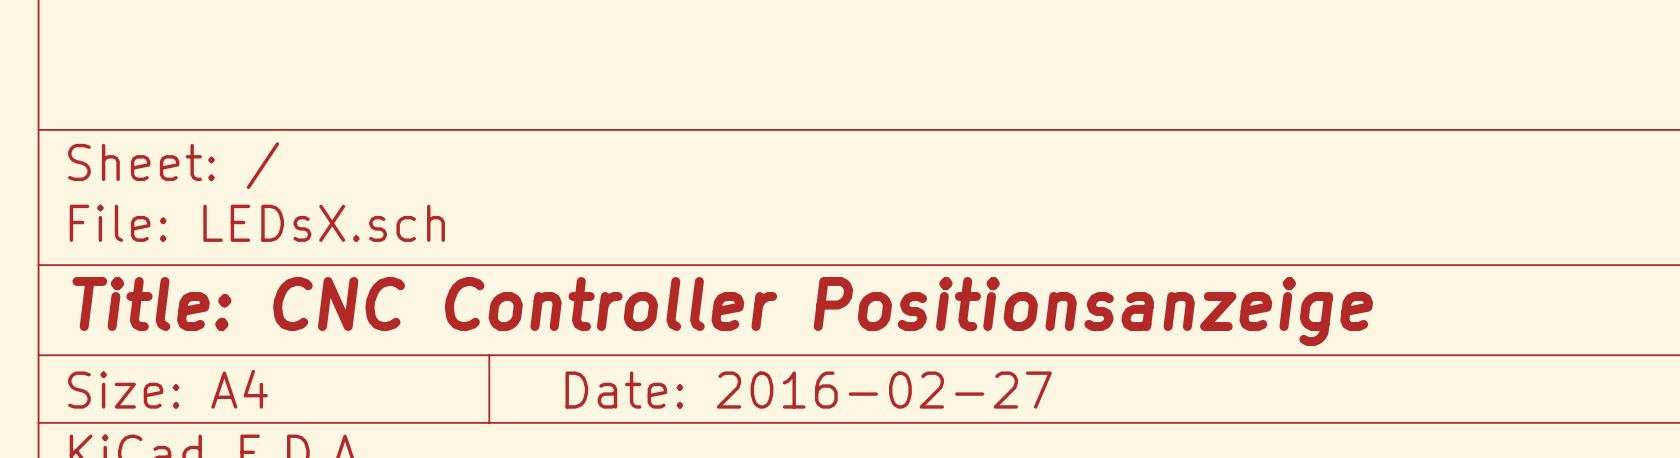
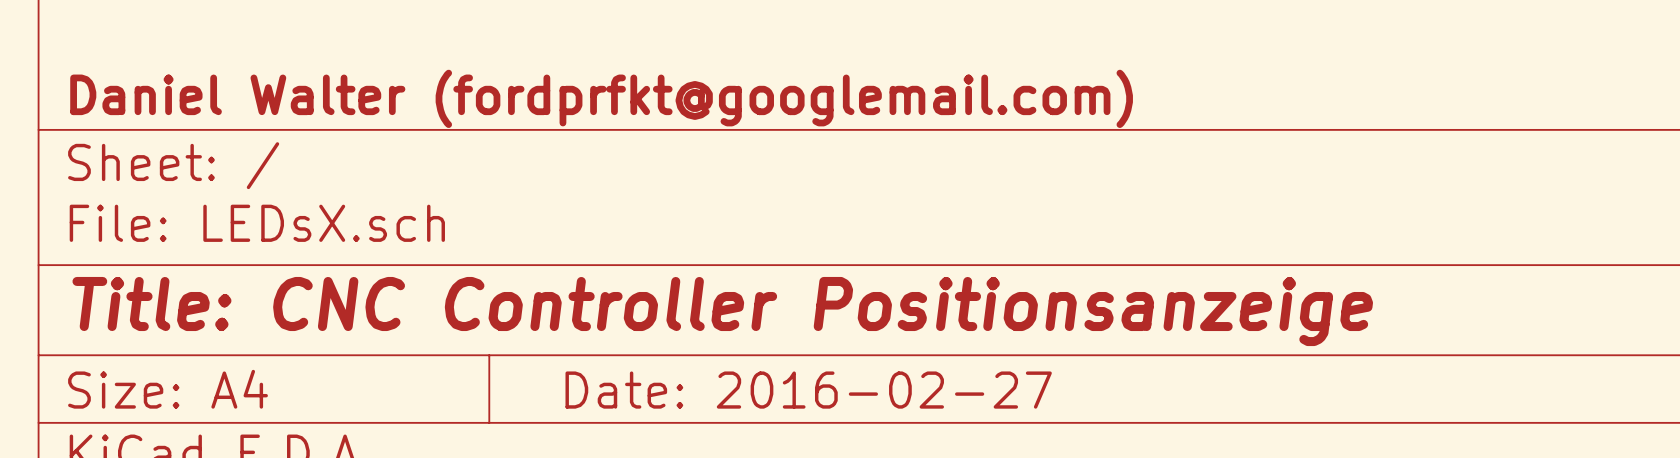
title block: none -> Daniel Walter (fordprfkt@googlemail.com) (601, 98)

